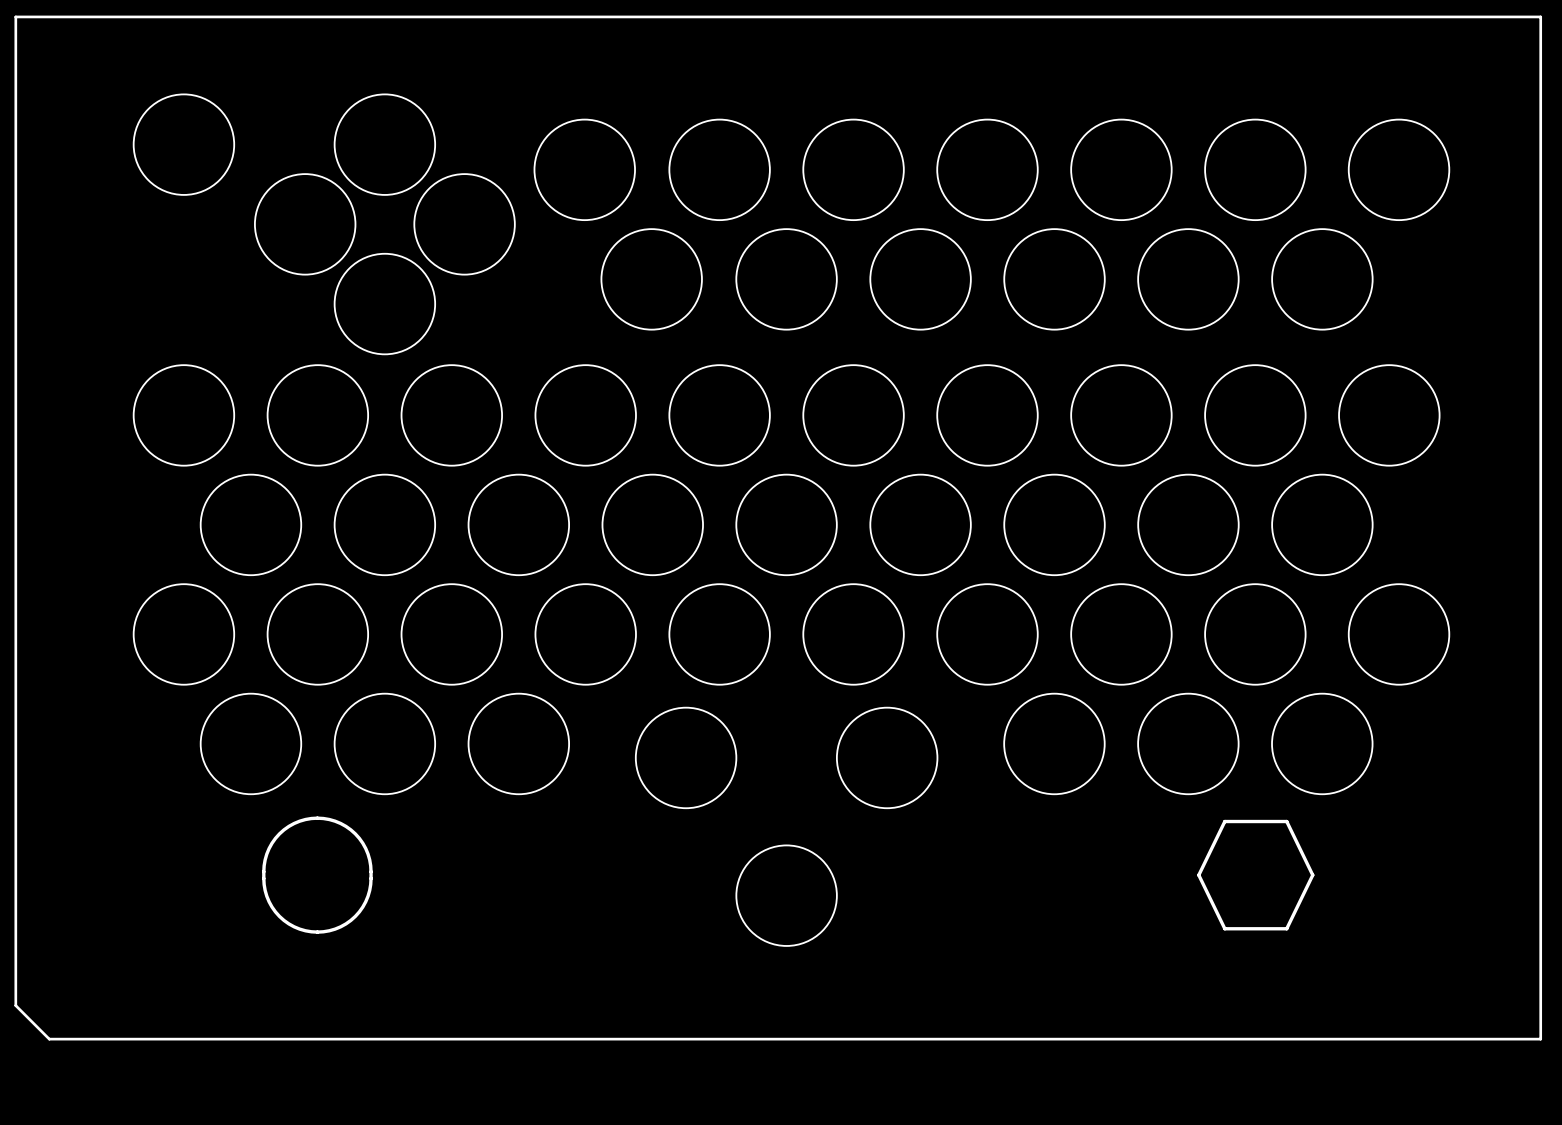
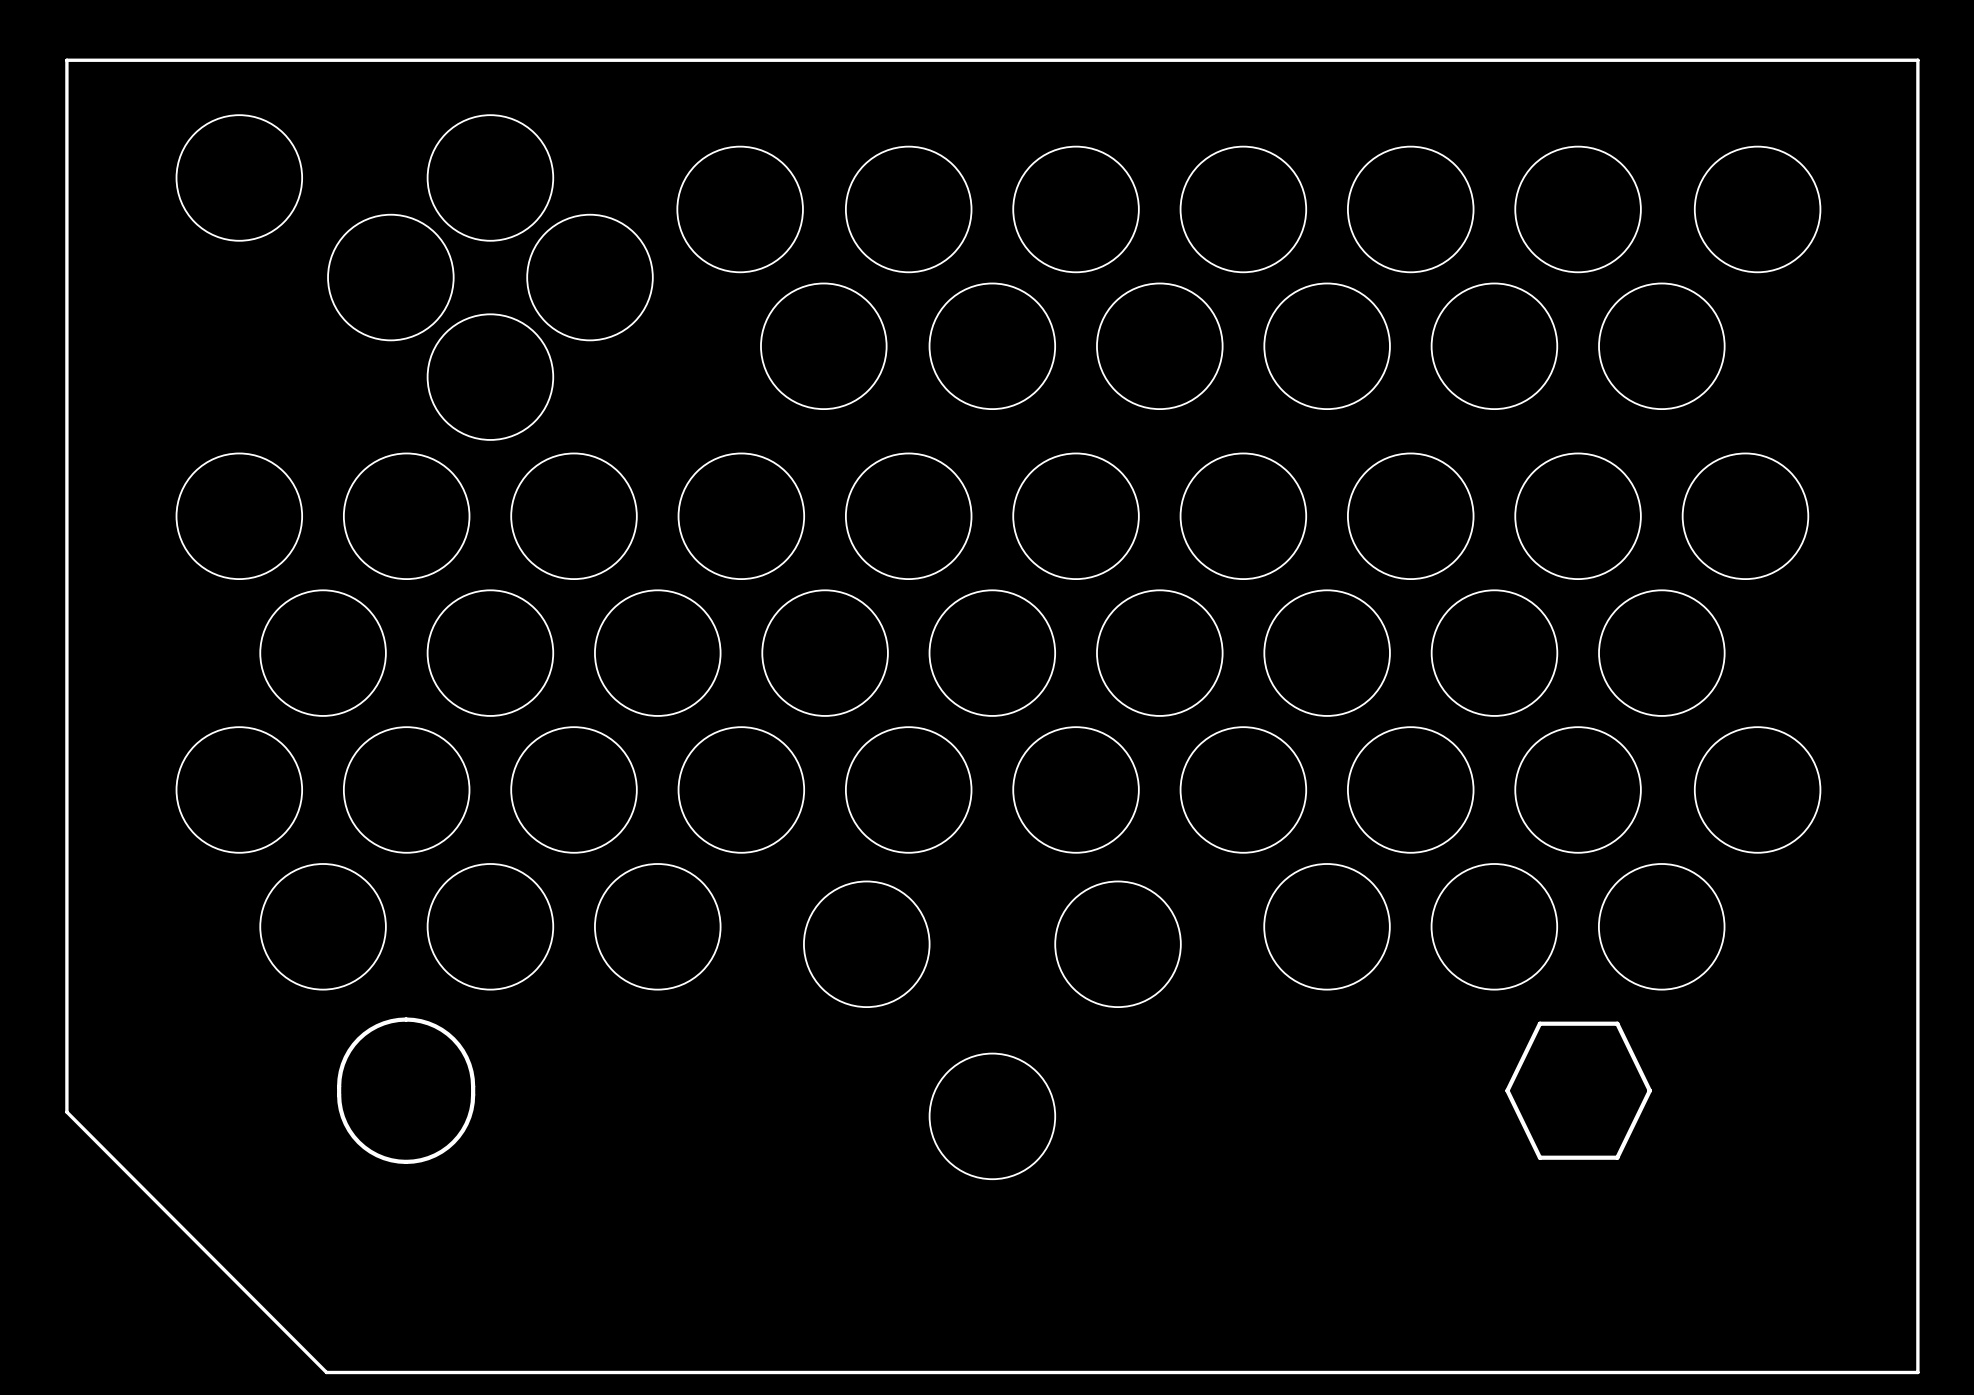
board edge: (15, 16) (1540, 16) (1540, 1039) (49, 1039) (15, 1005) (15, 16) -> (66, 60) (66, 1112) (326, 1372) (1917, 1372) (1917, 60) (66, 60)

